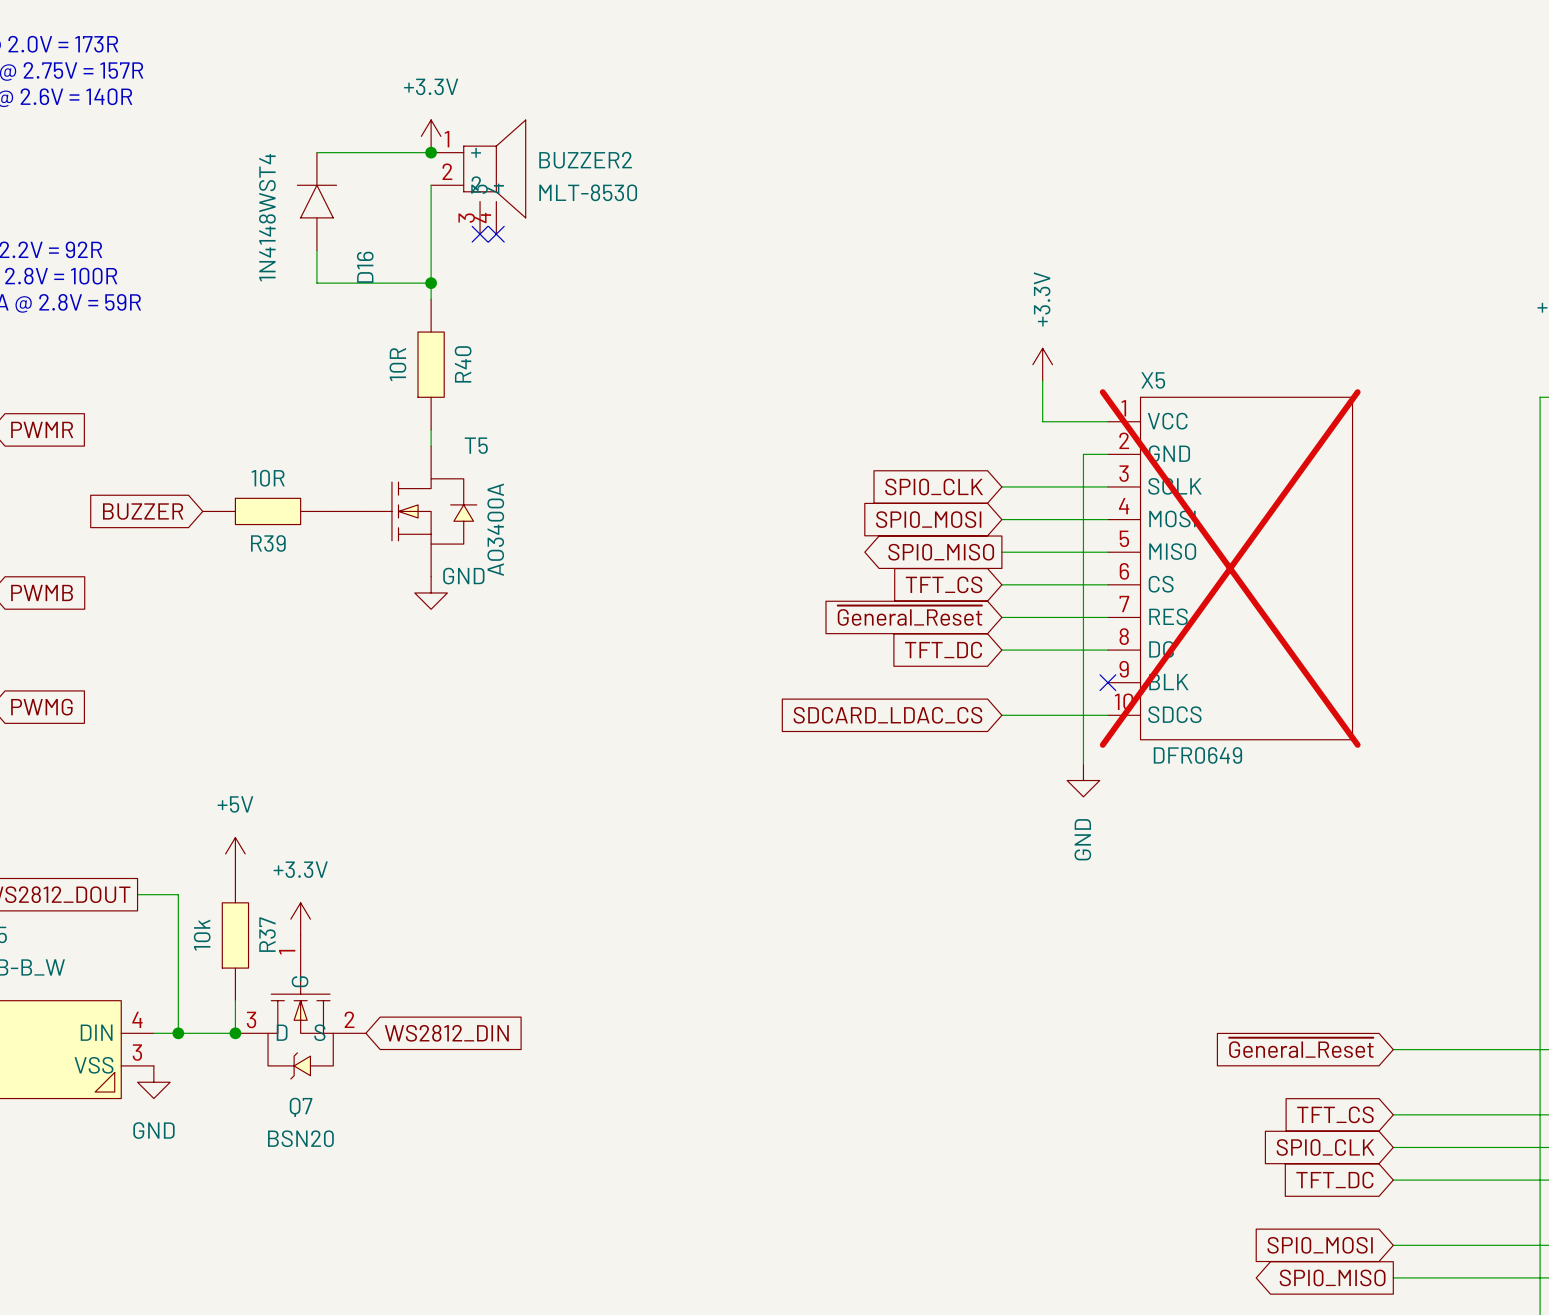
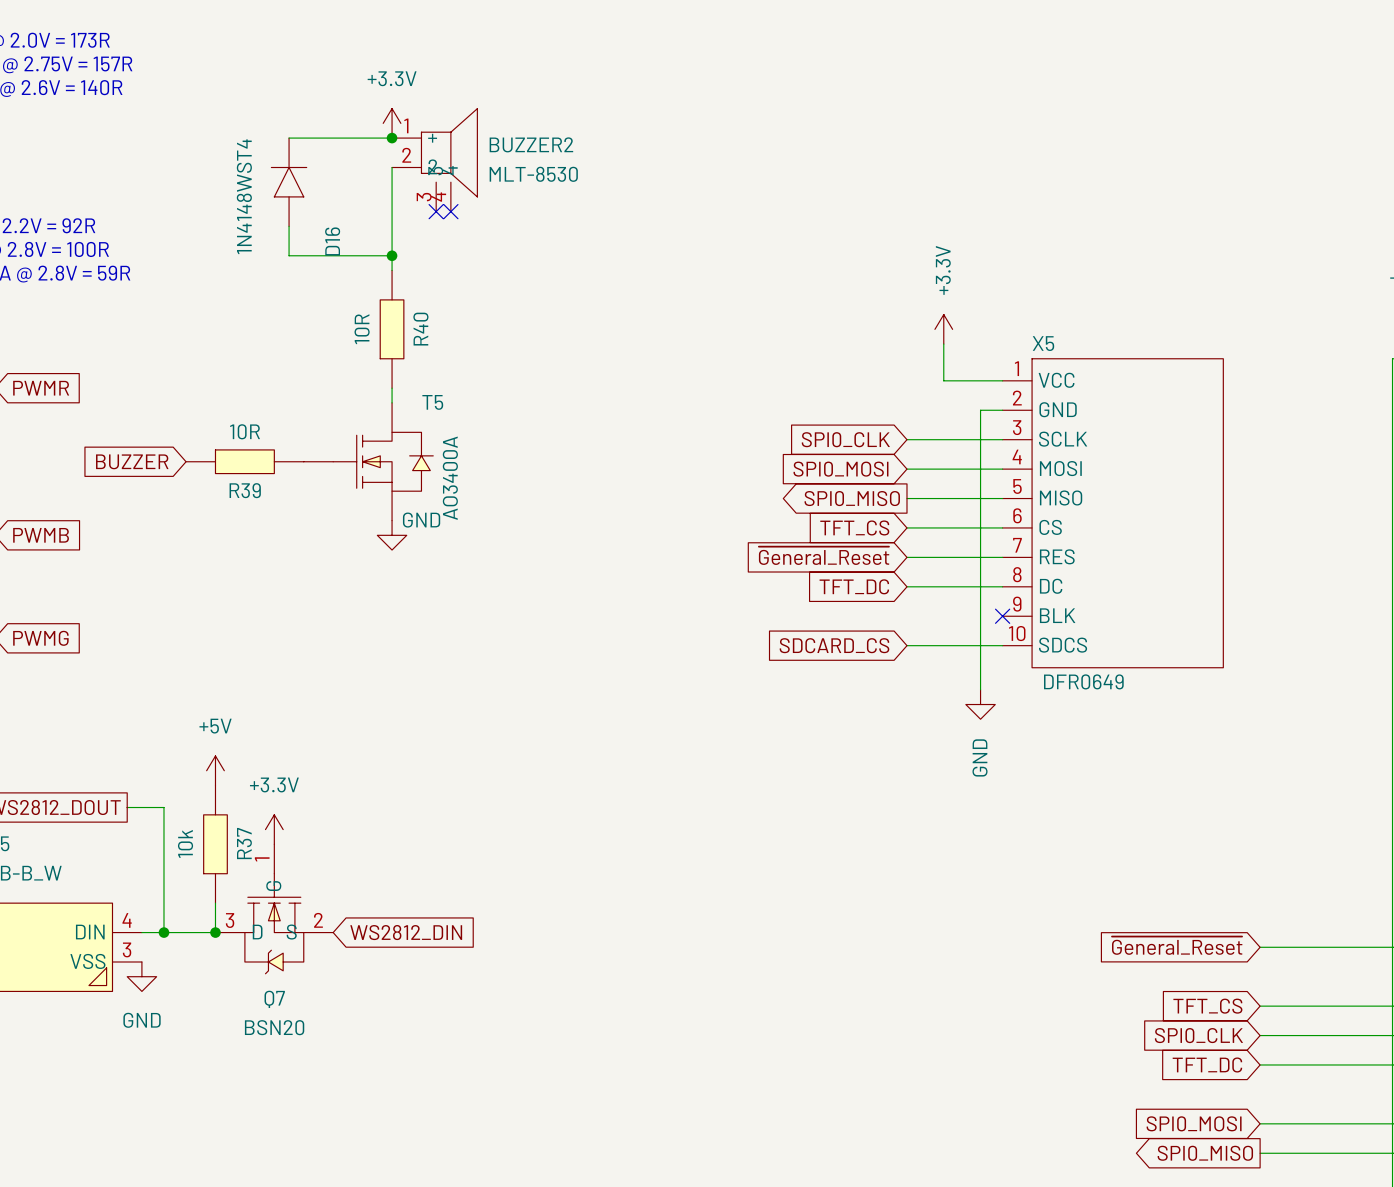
X5 do-not-place cross: (1230, 568) -> none
global label: SDCARD_LDAC_CS (887, 715) -> SDCARD_CS (834, 645)

